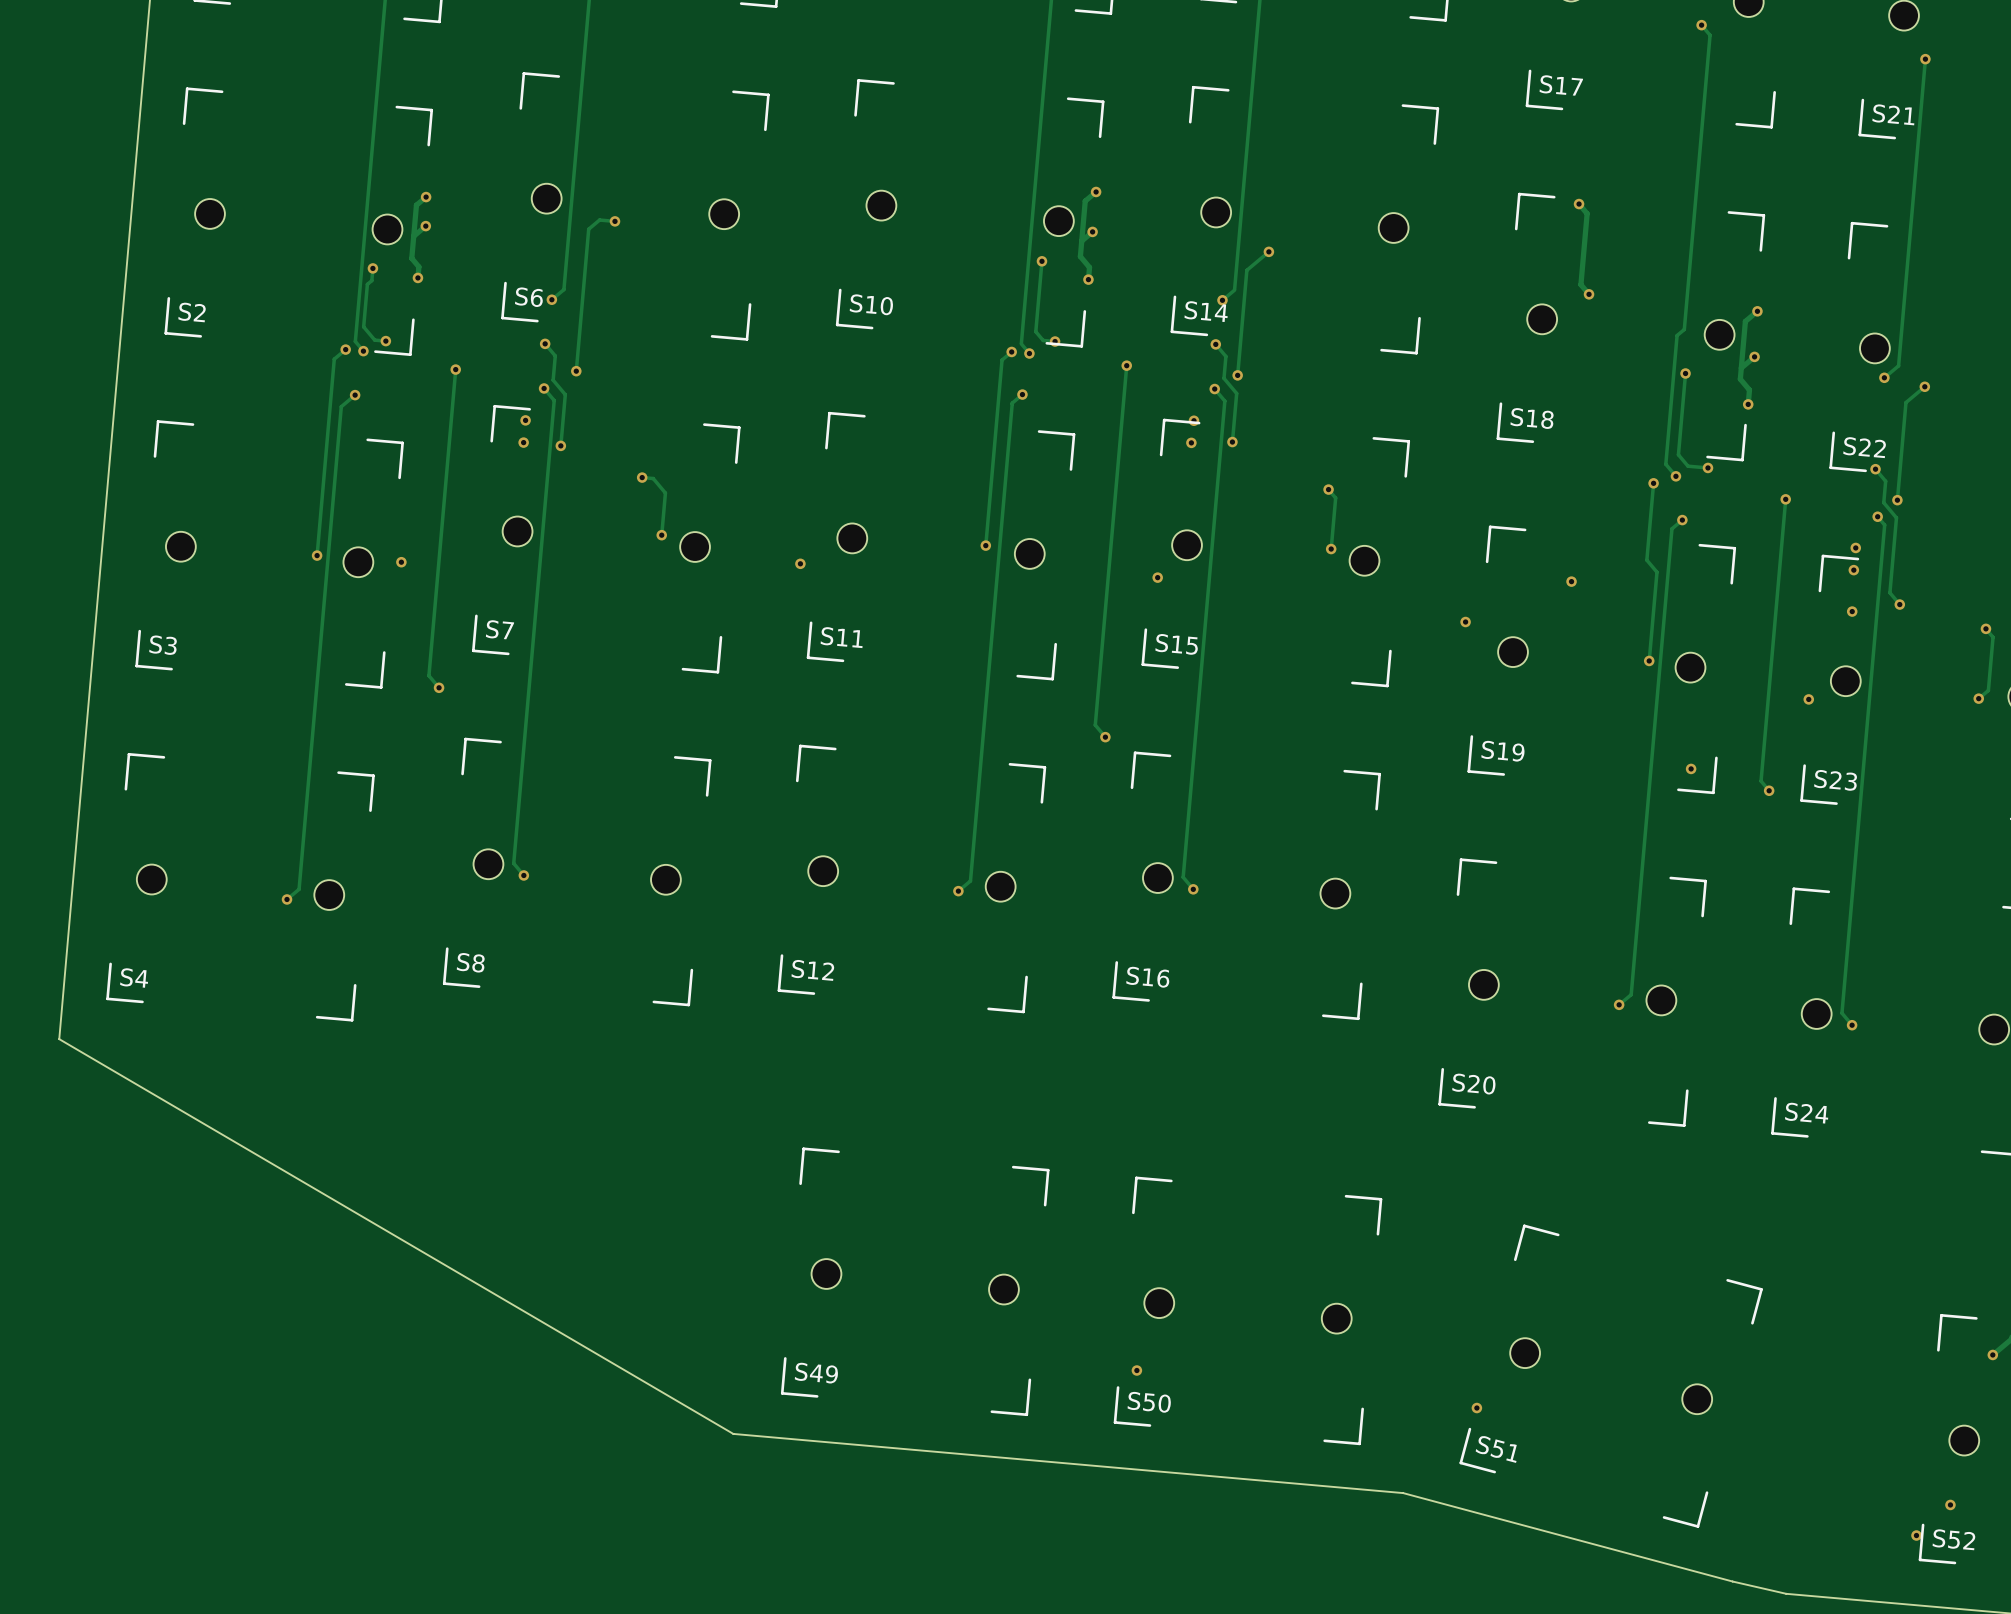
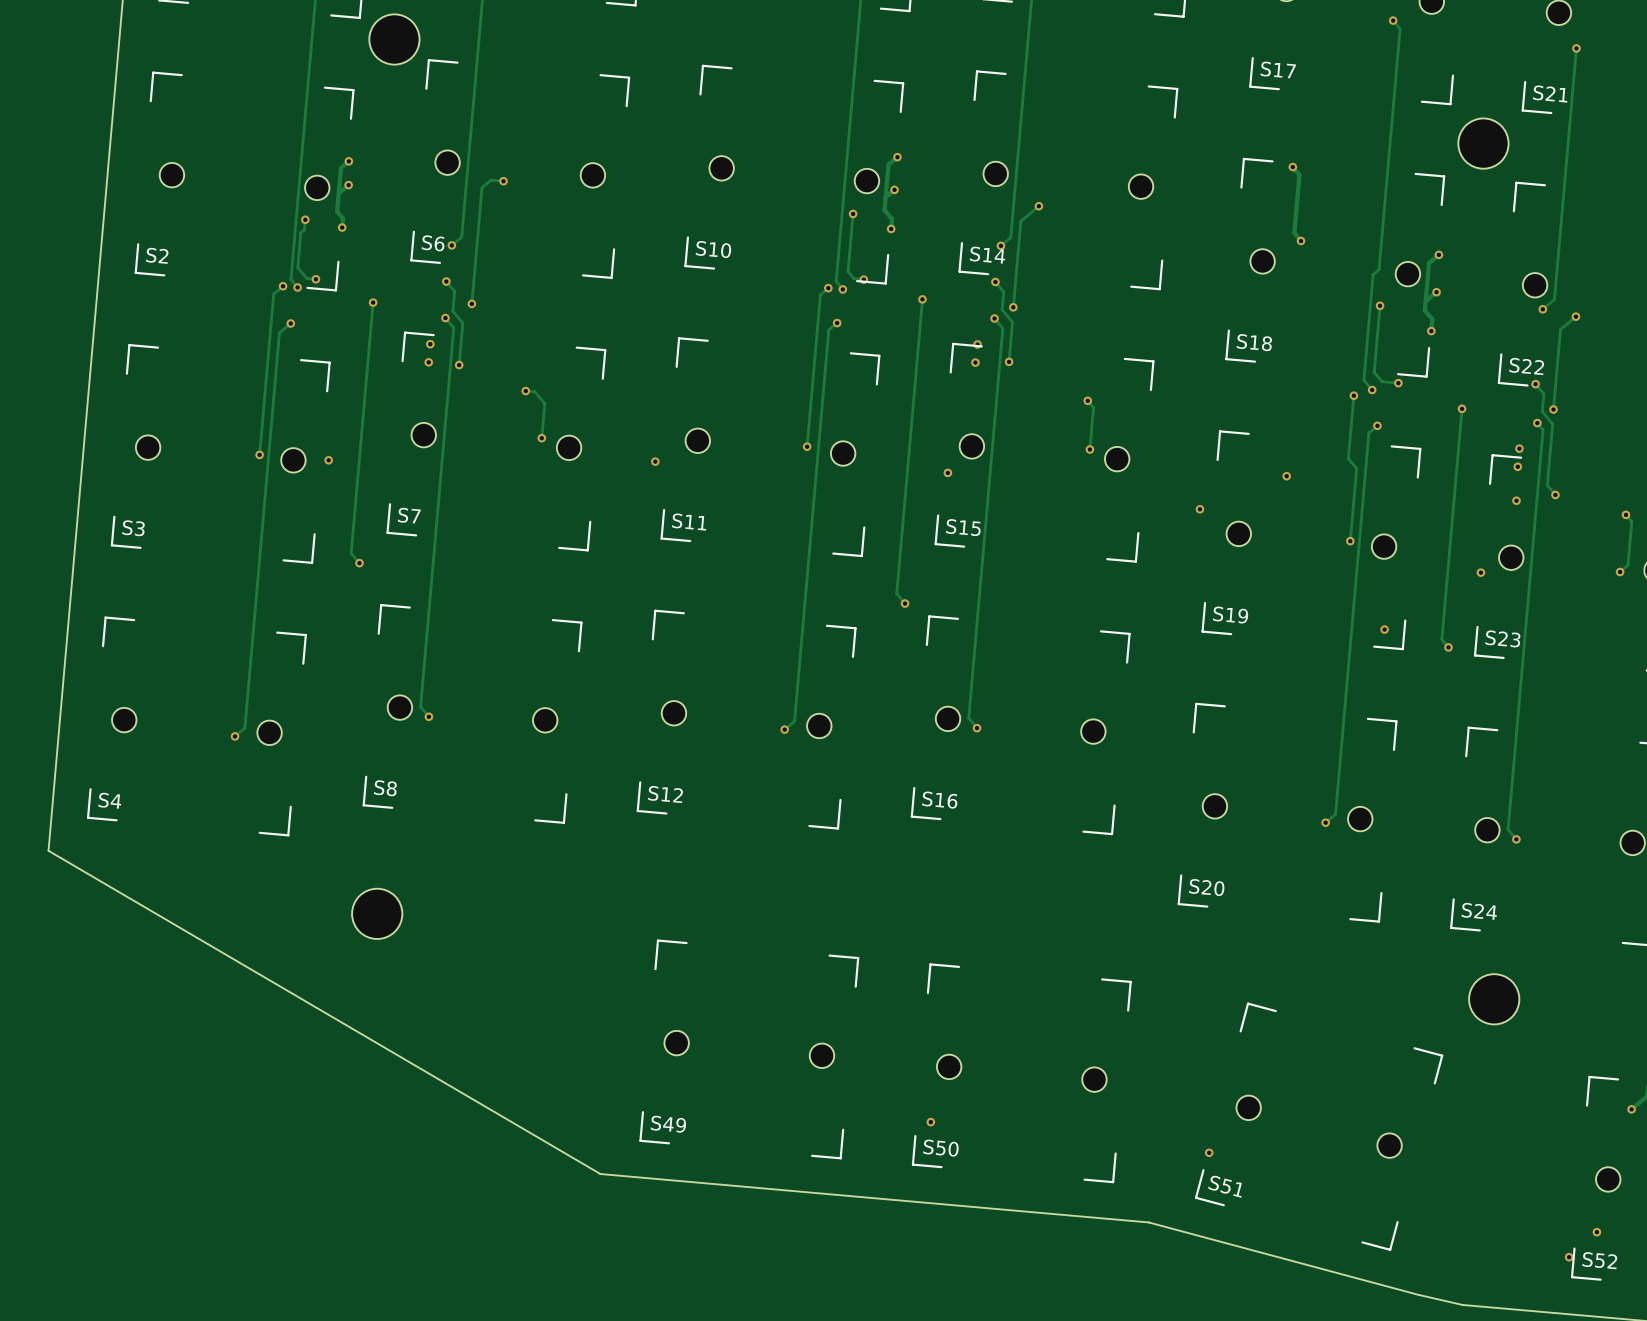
part: none -> (394, 39)
part: none -> (1483, 143)
part: none -> (377, 913)
part: none -> (1494, 999)

